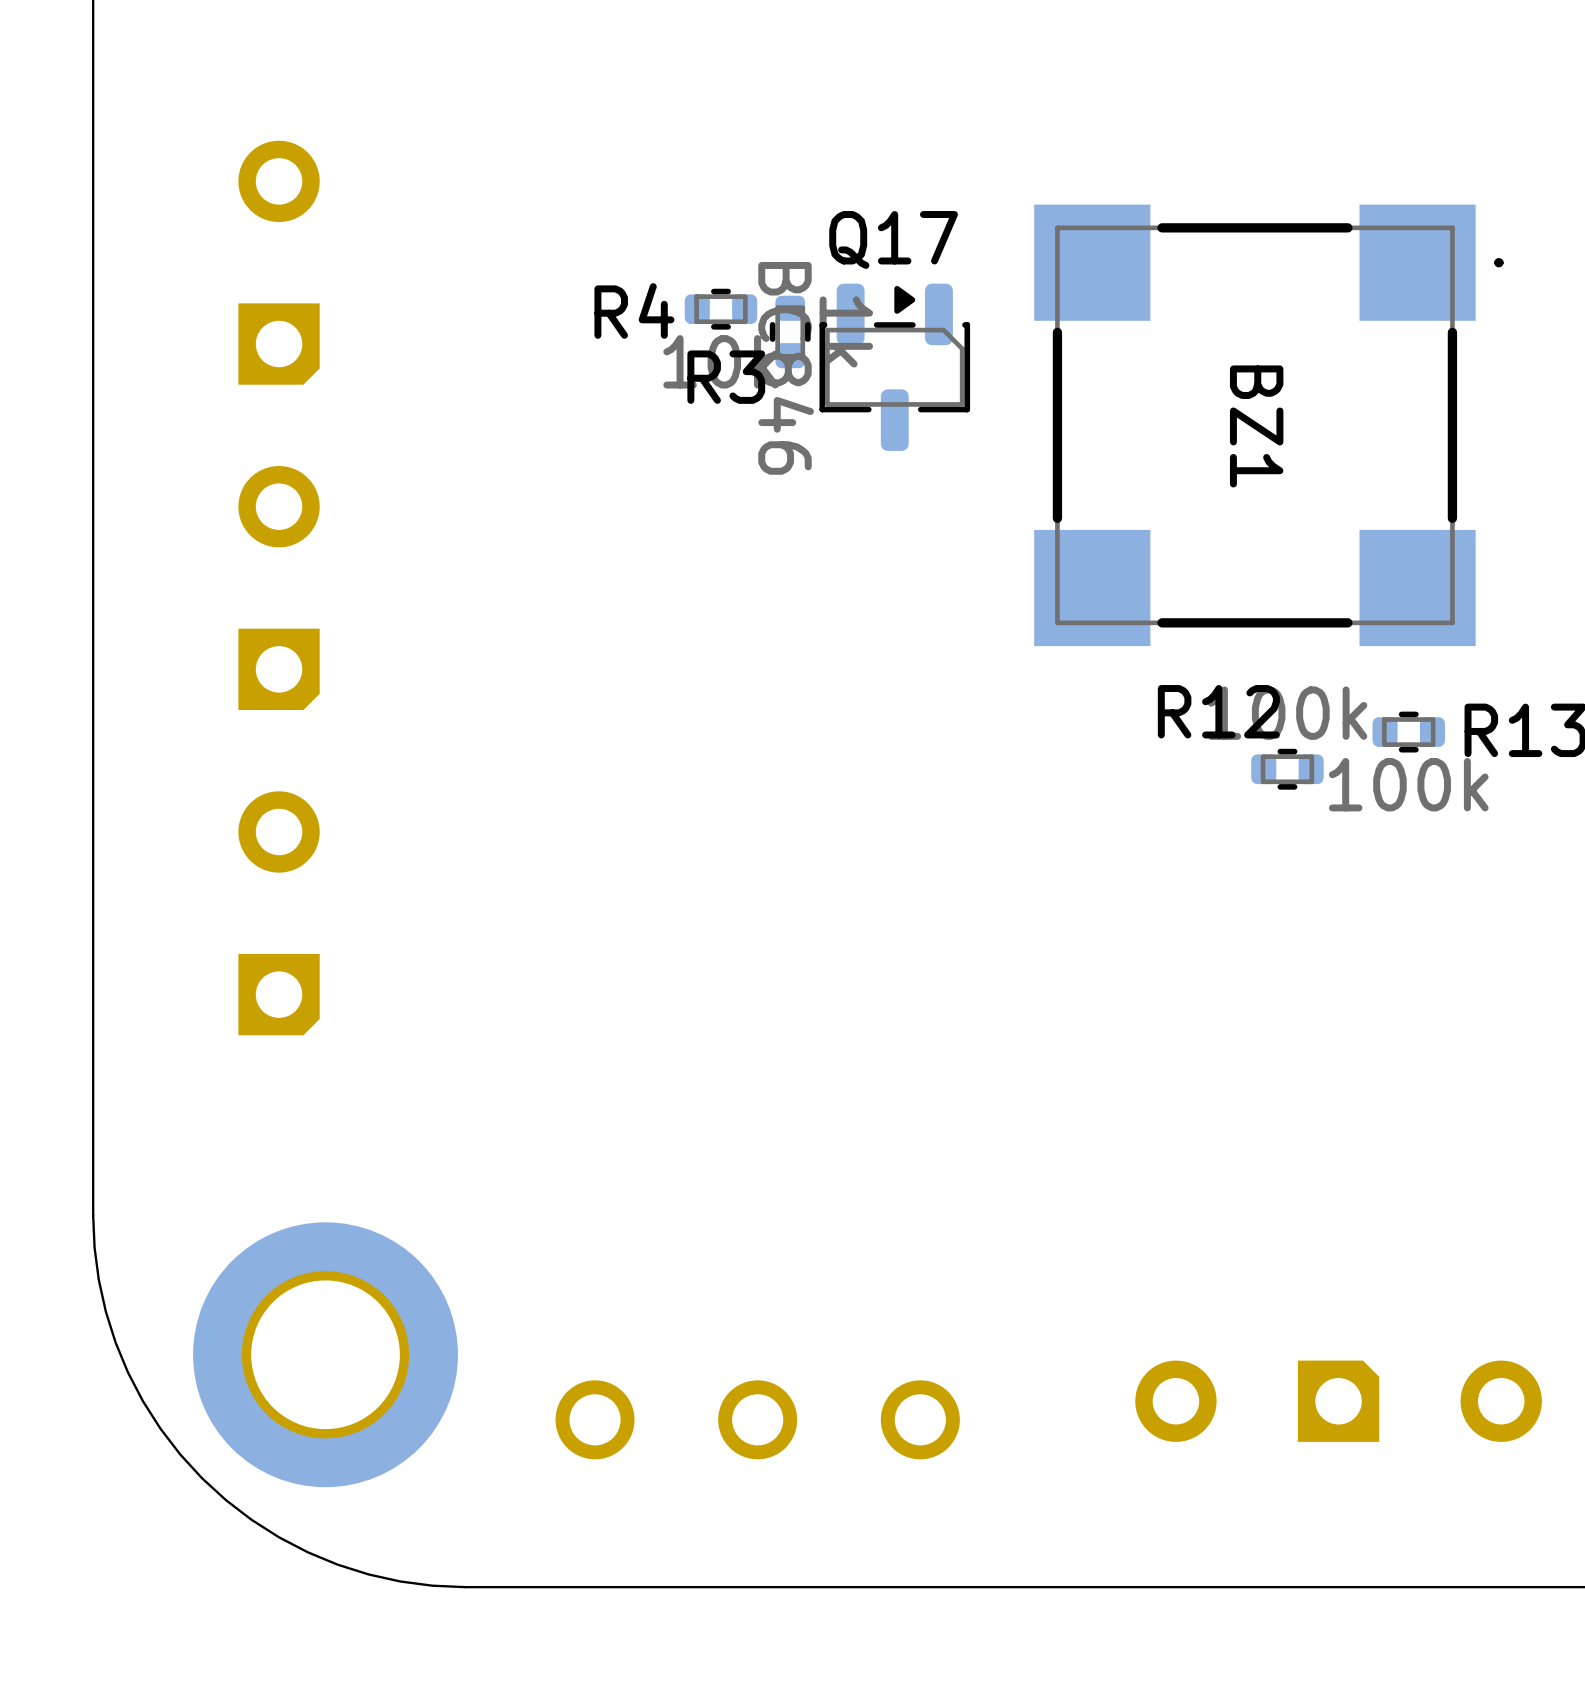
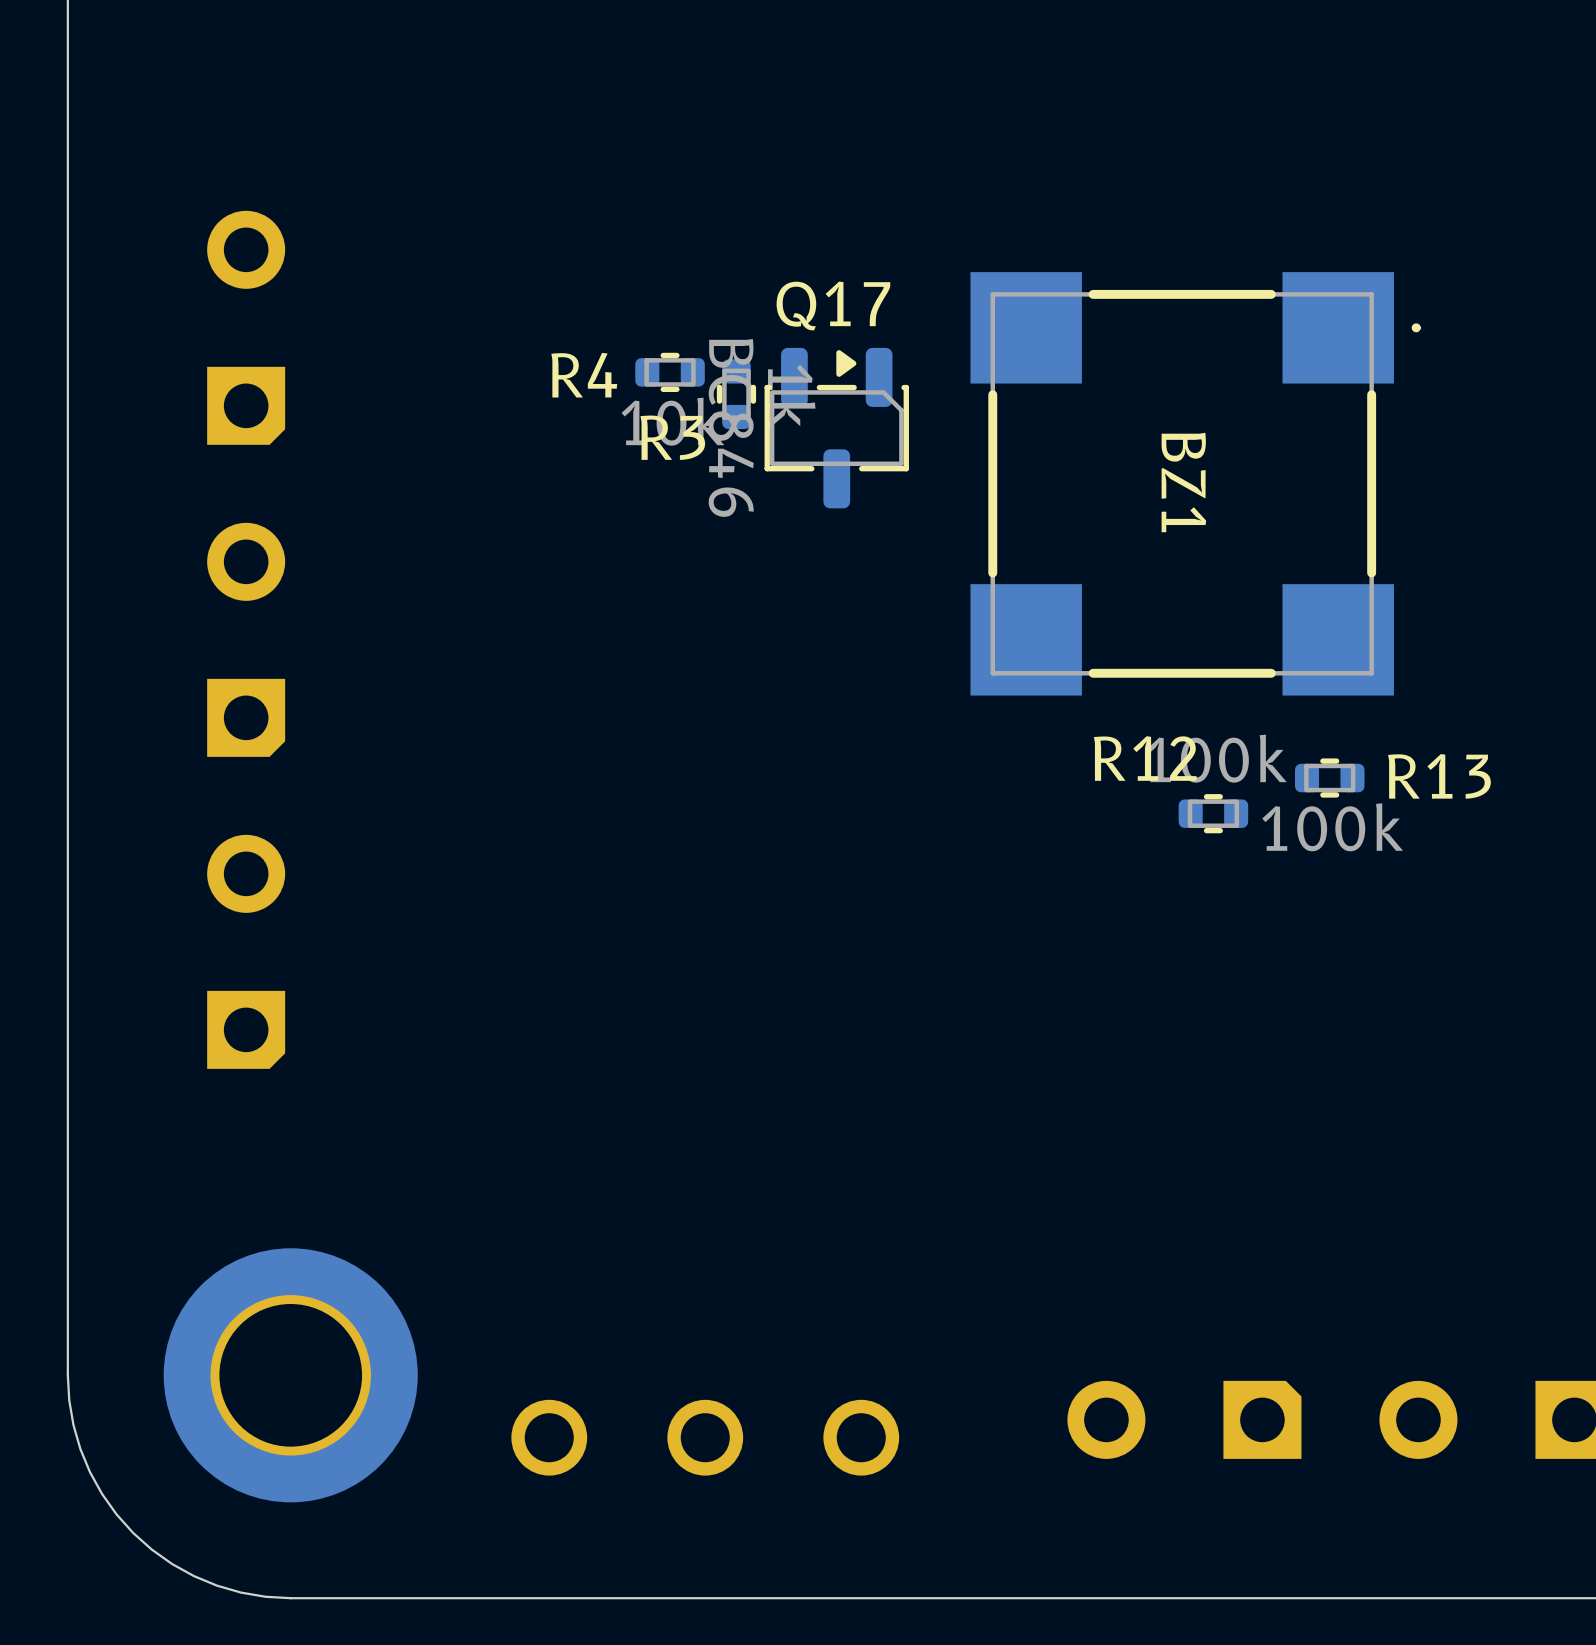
board edge: (93, 1215) (98, 1279) (115, 1342) (128, 1372) (160, 1428) (202, 1478) (251, 1519) (279, 1537) (337, 1564) (400, 1581) (464, 1587) -> (67, 1241) (67, 1375) (73, 1424) (80, 1448) (102, 1493) (133, 1532) (172, 1564) (194, 1576) (241, 1592) (290, 1598) (424, 1598)

